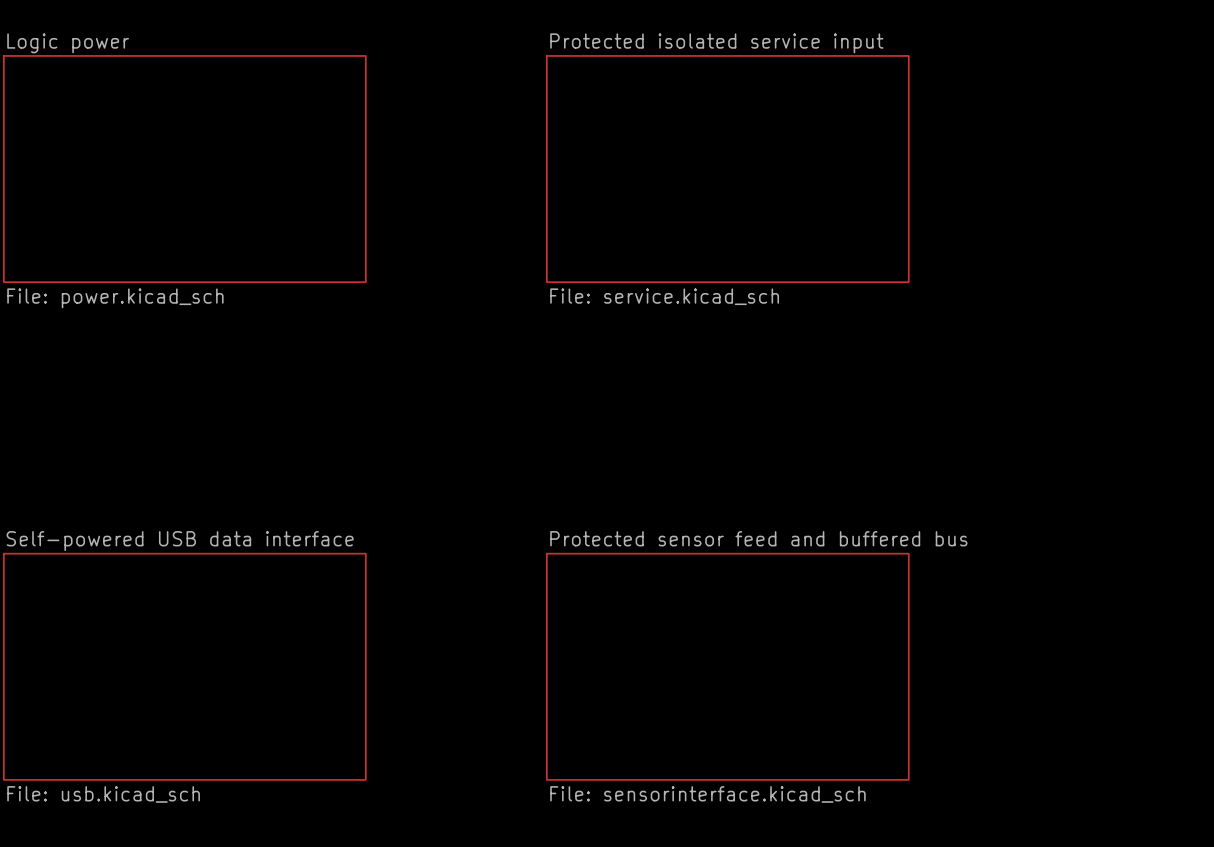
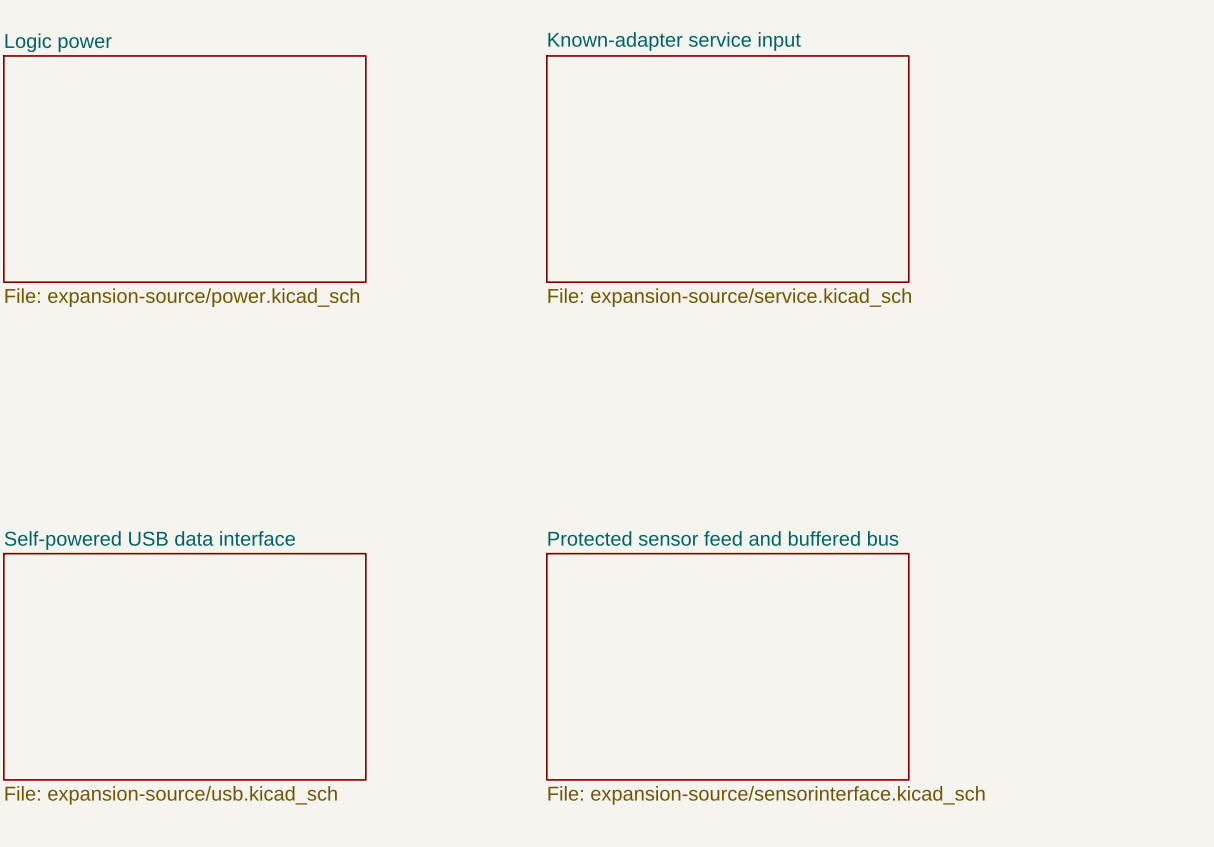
sheet Protected isolated service input name: Protected isolated service input (716, 43) -> Known-adapter service input (674, 41)
sheet Protected isolated service input value: File: service.kicad_sch (664, 296) -> File: expansion-source/service.kicad_sch (729, 297)
sheet Logic power value: File: power.kicad_sch (115, 298) -> File: expansion-source/power.kicad_sch (182, 297)
sheet Self-powered USB data interface value: File: usb.kicad_sch (103, 794) -> File: expansion-source/usb.kicad_sch (171, 795)
sheet Protected sensor feed and buffered bus value: File: sensorinterface.kicad_sch (707, 794) -> File: expansion-source/sensorinterface.kicad_sch (766, 795)

